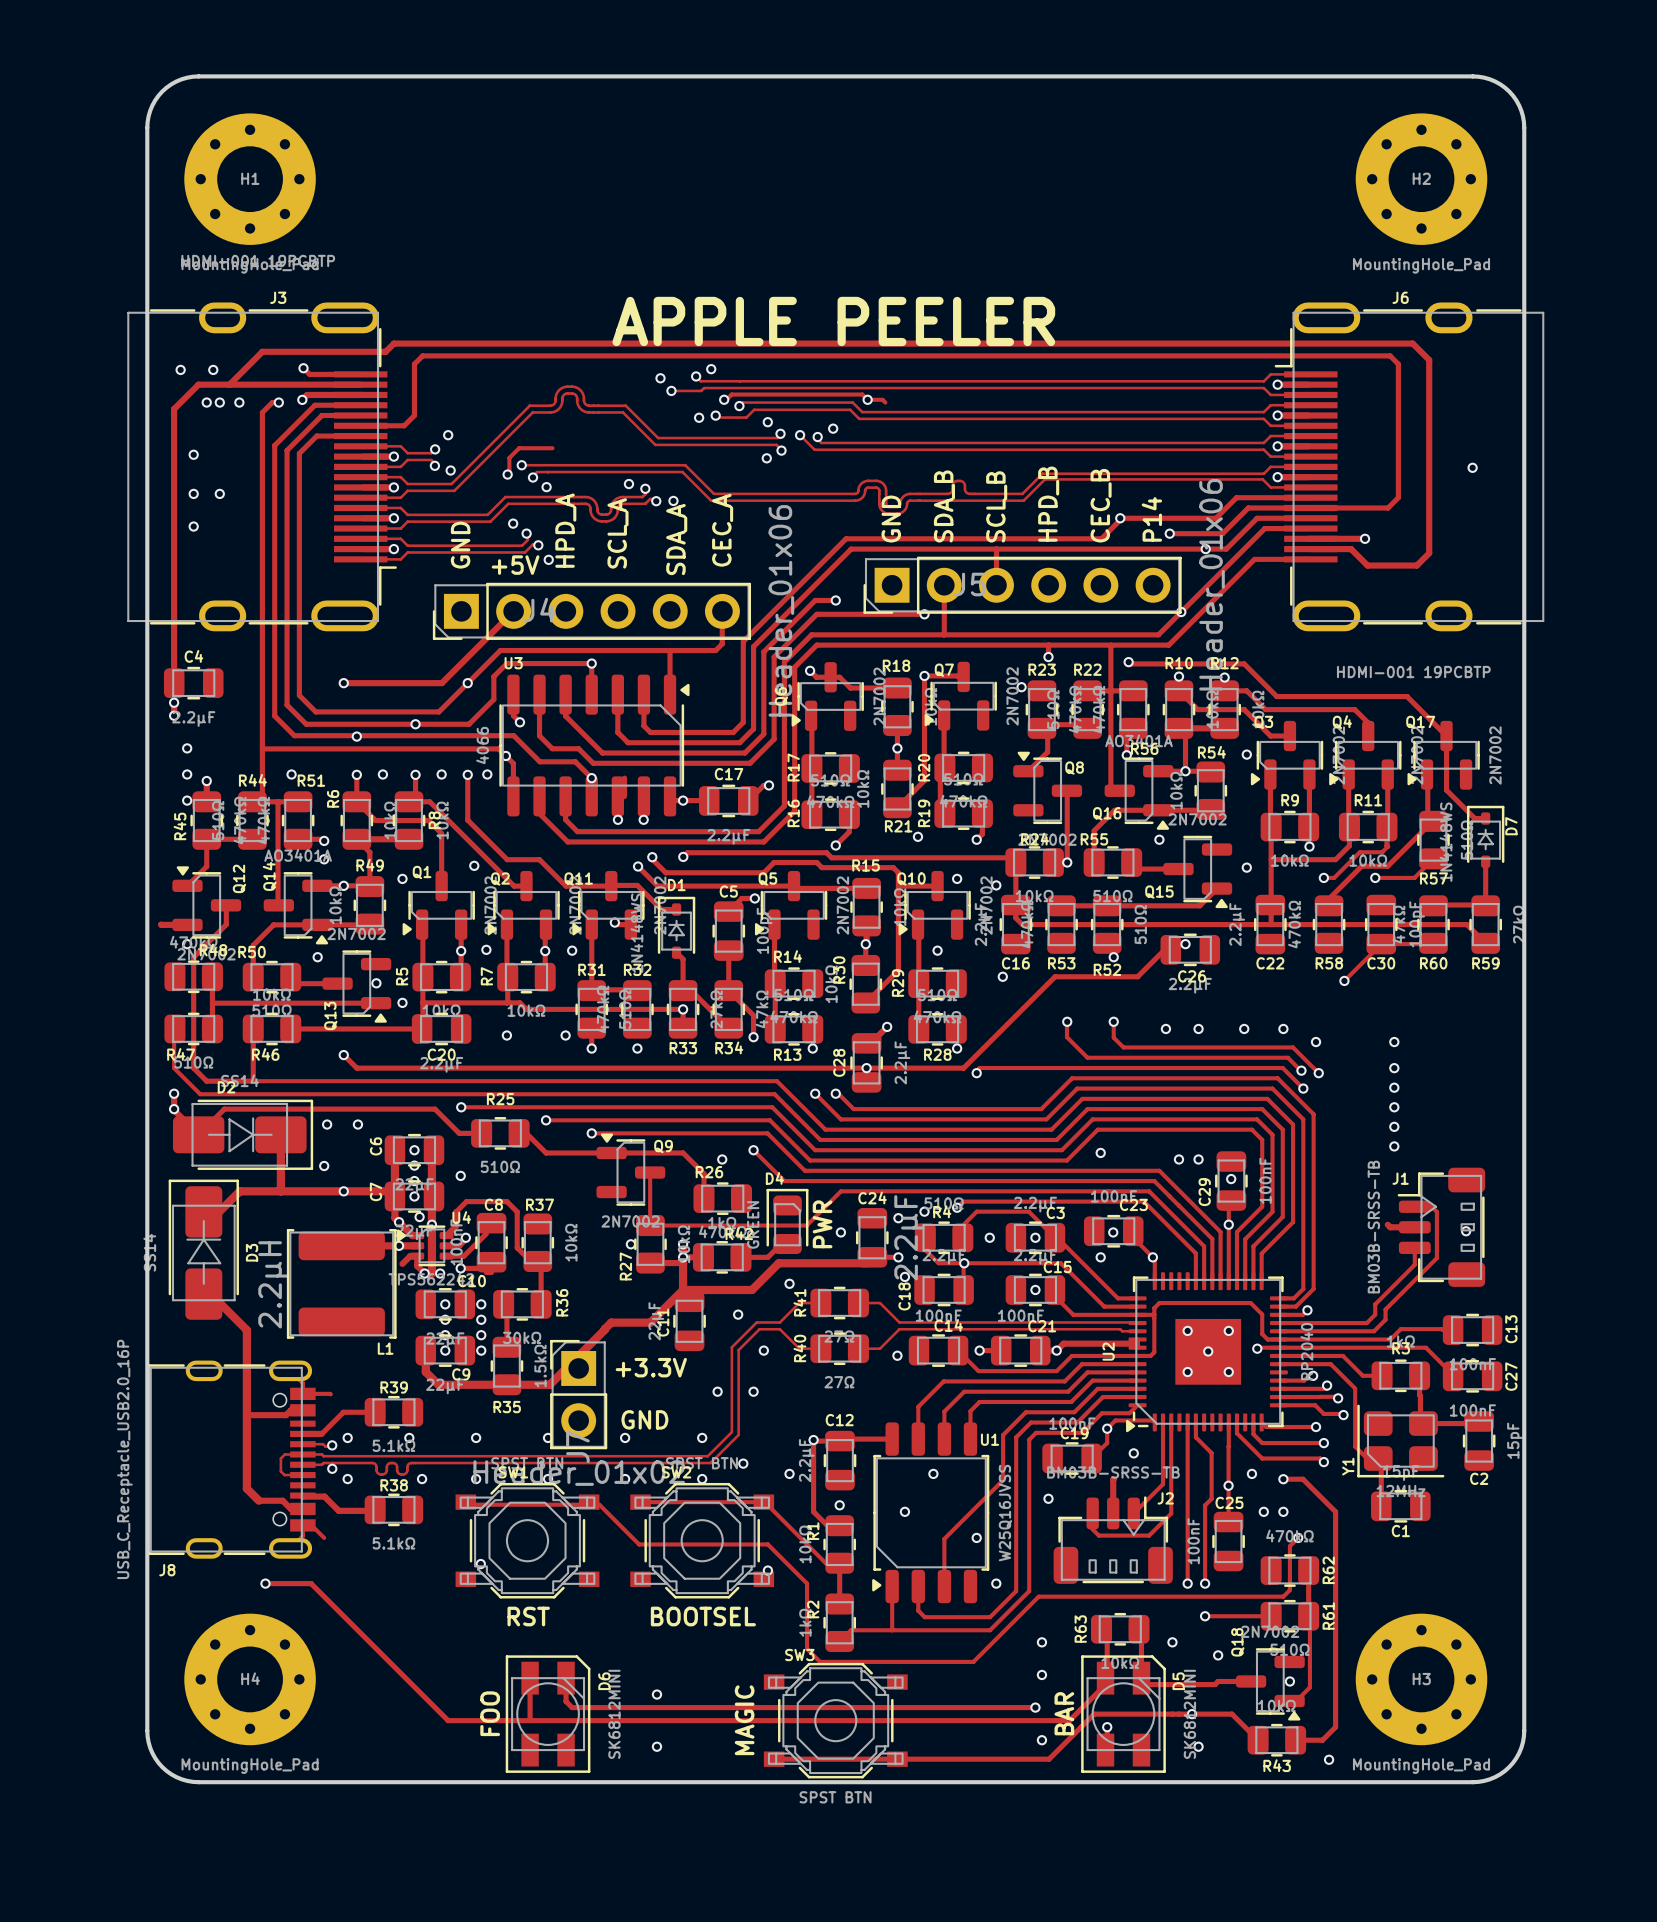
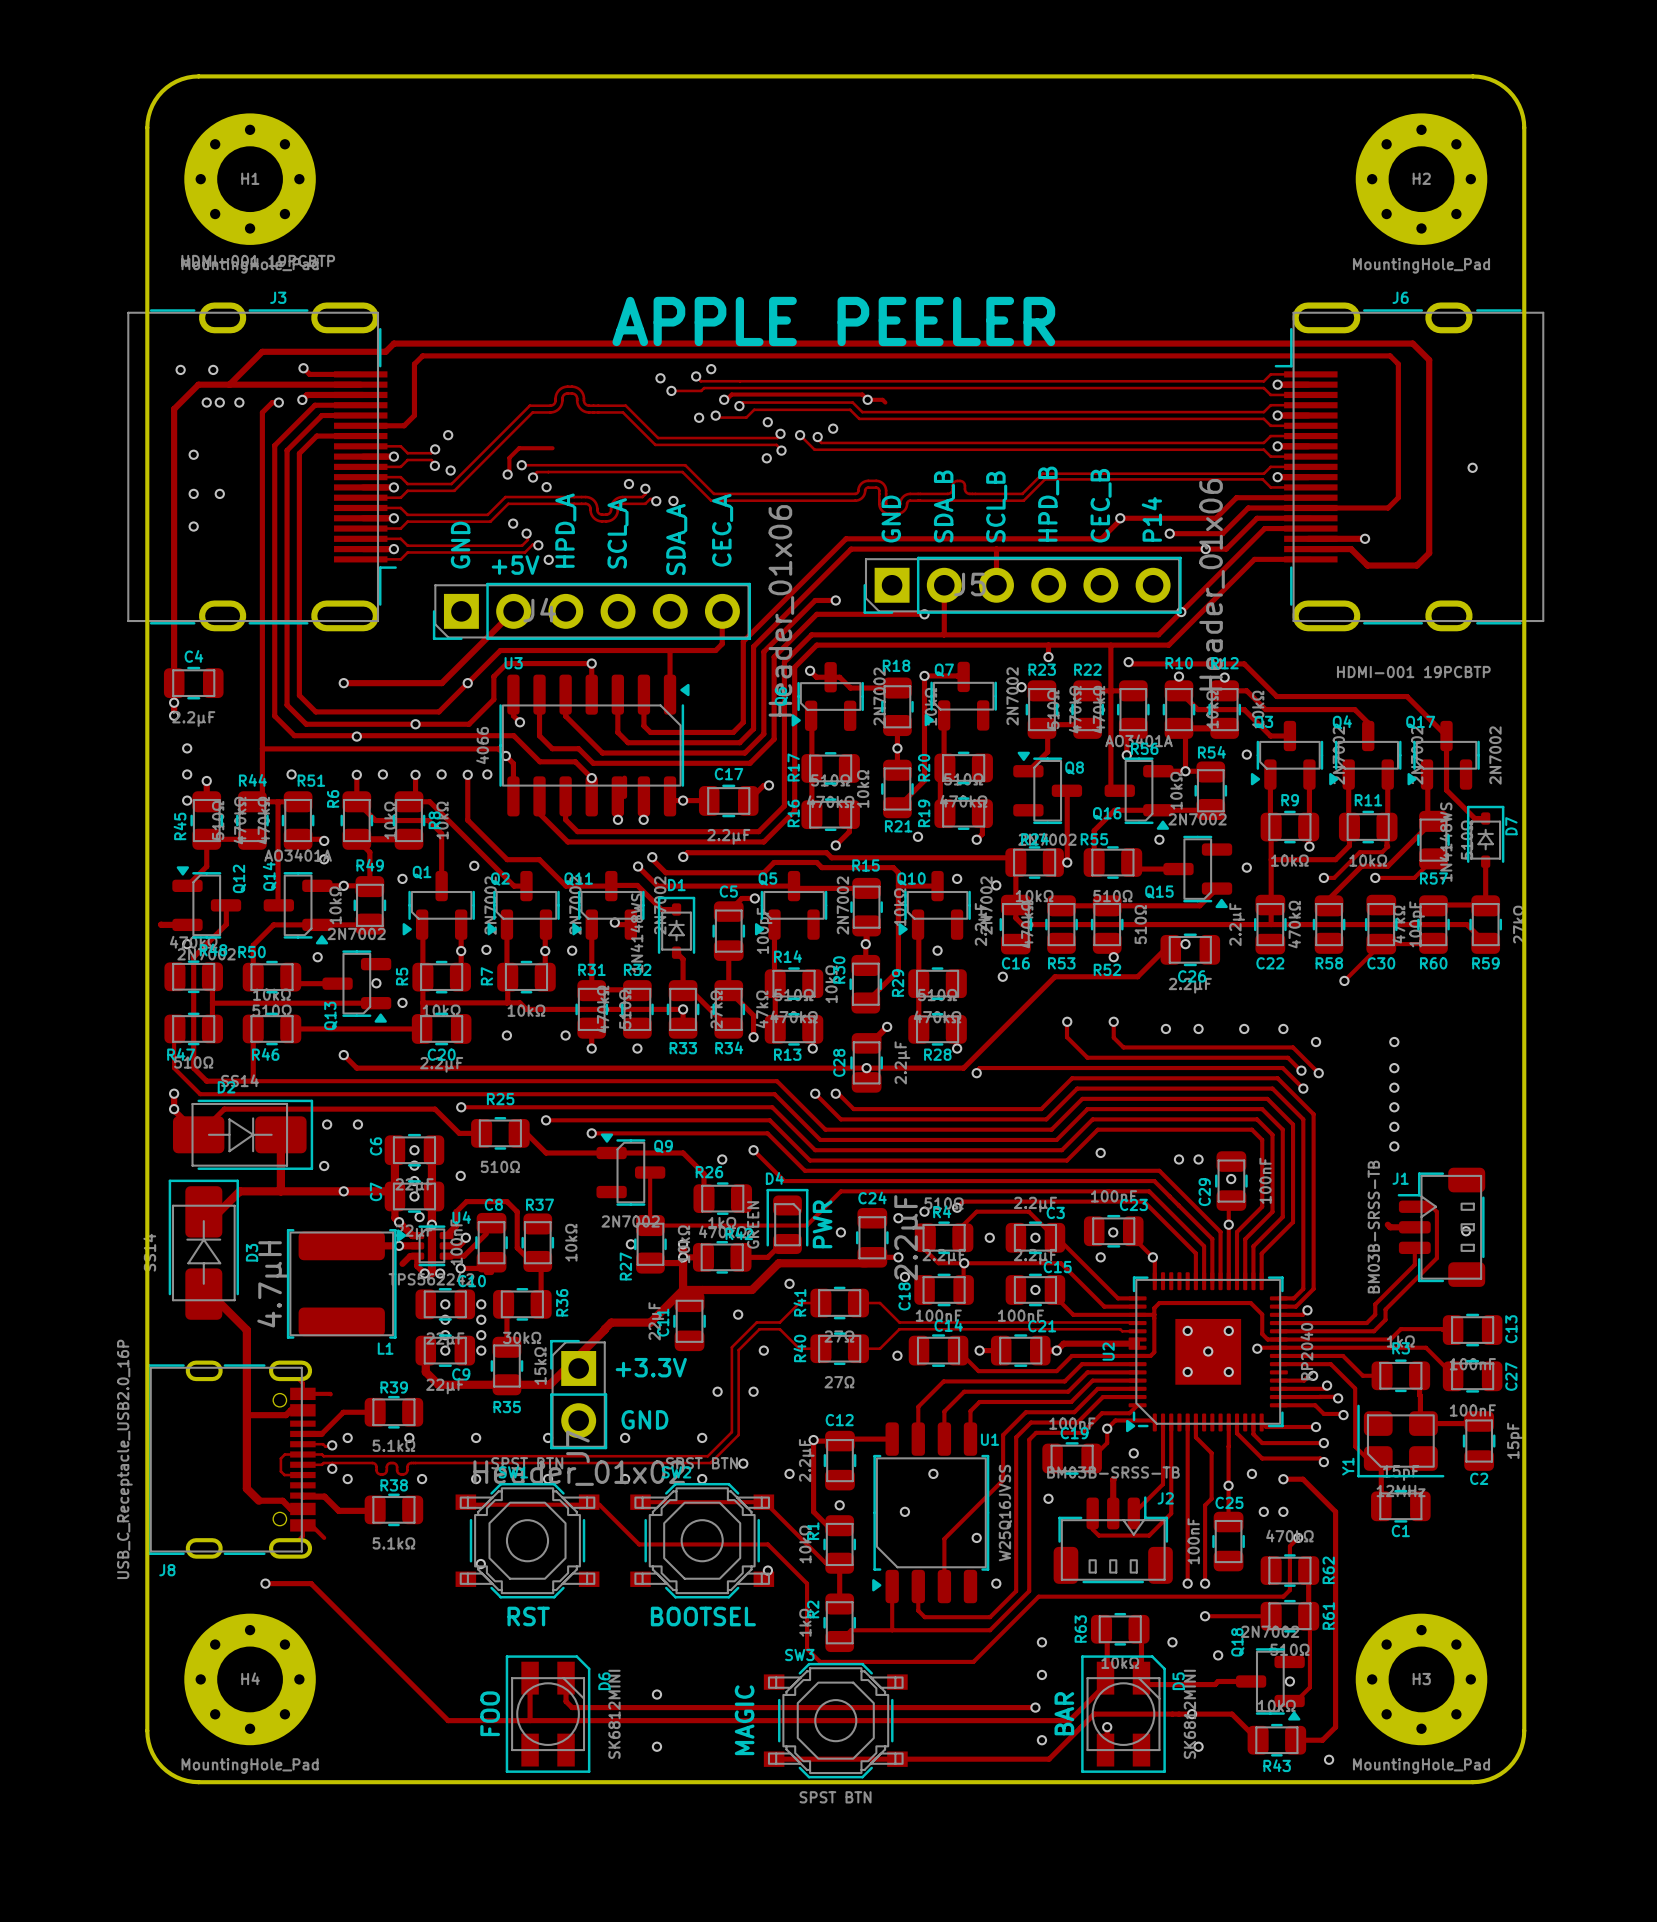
L1 value: 2.2μH (273, 1284) -> 4.7μH (273, 1284)
R35 value: 1.5kΩ (540, 1366) -> 15kΩ (540, 1366)

